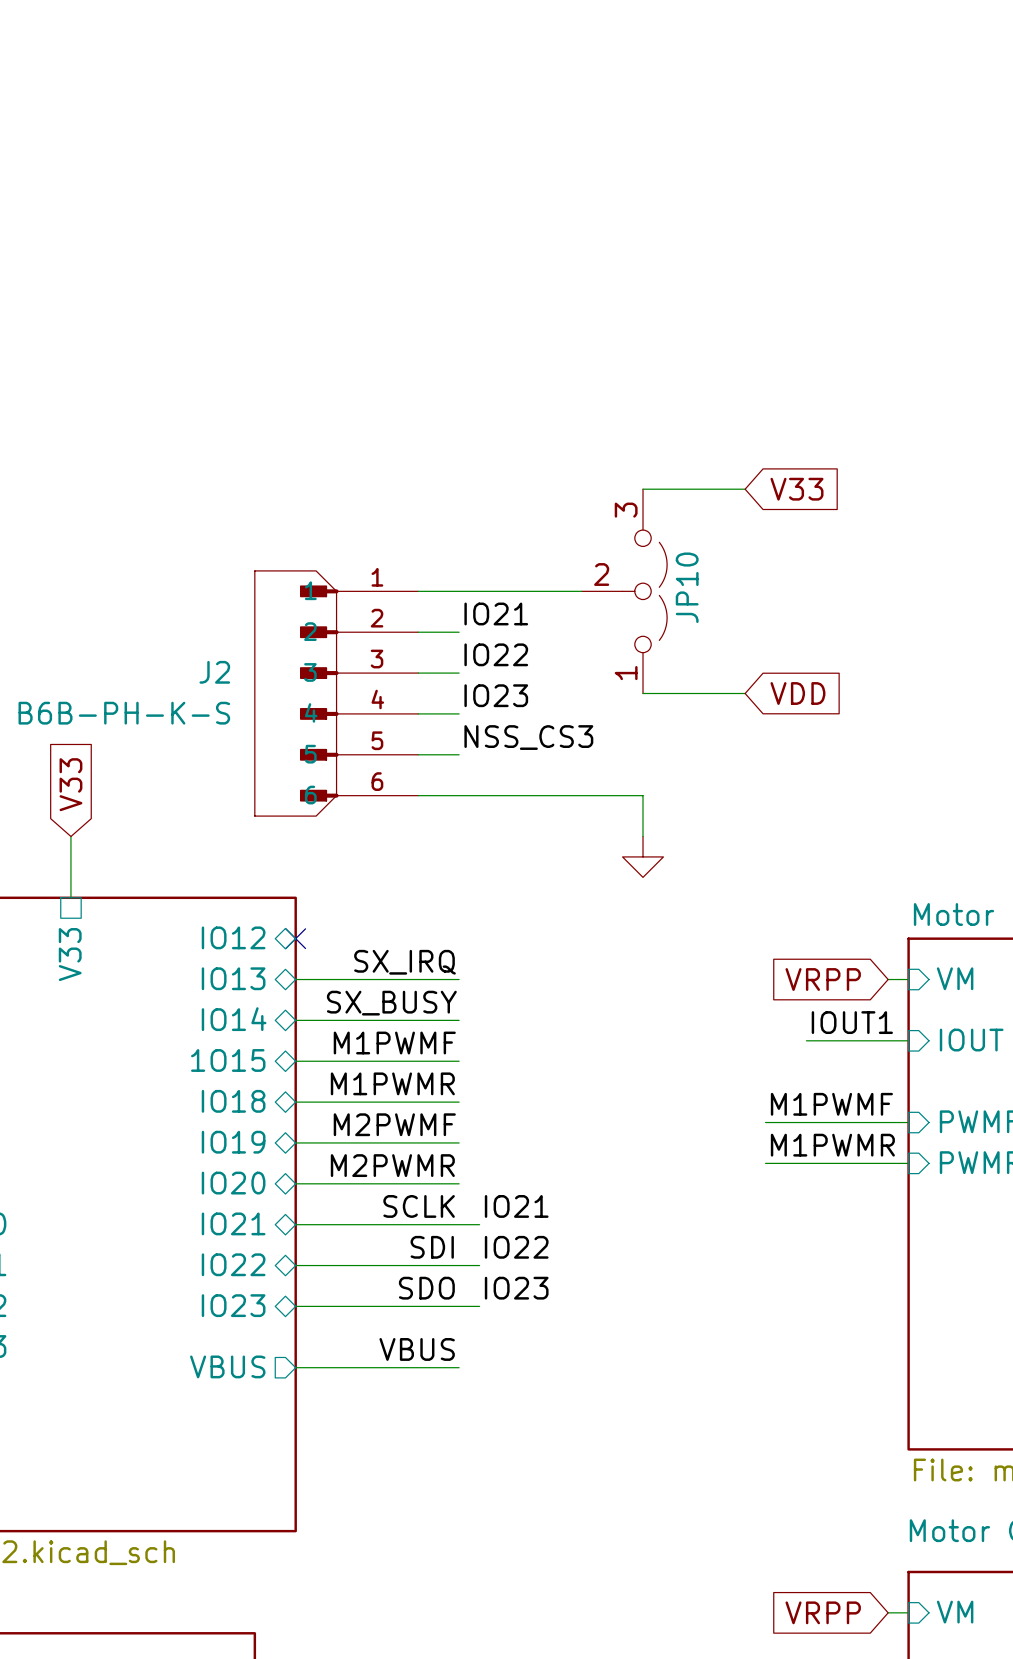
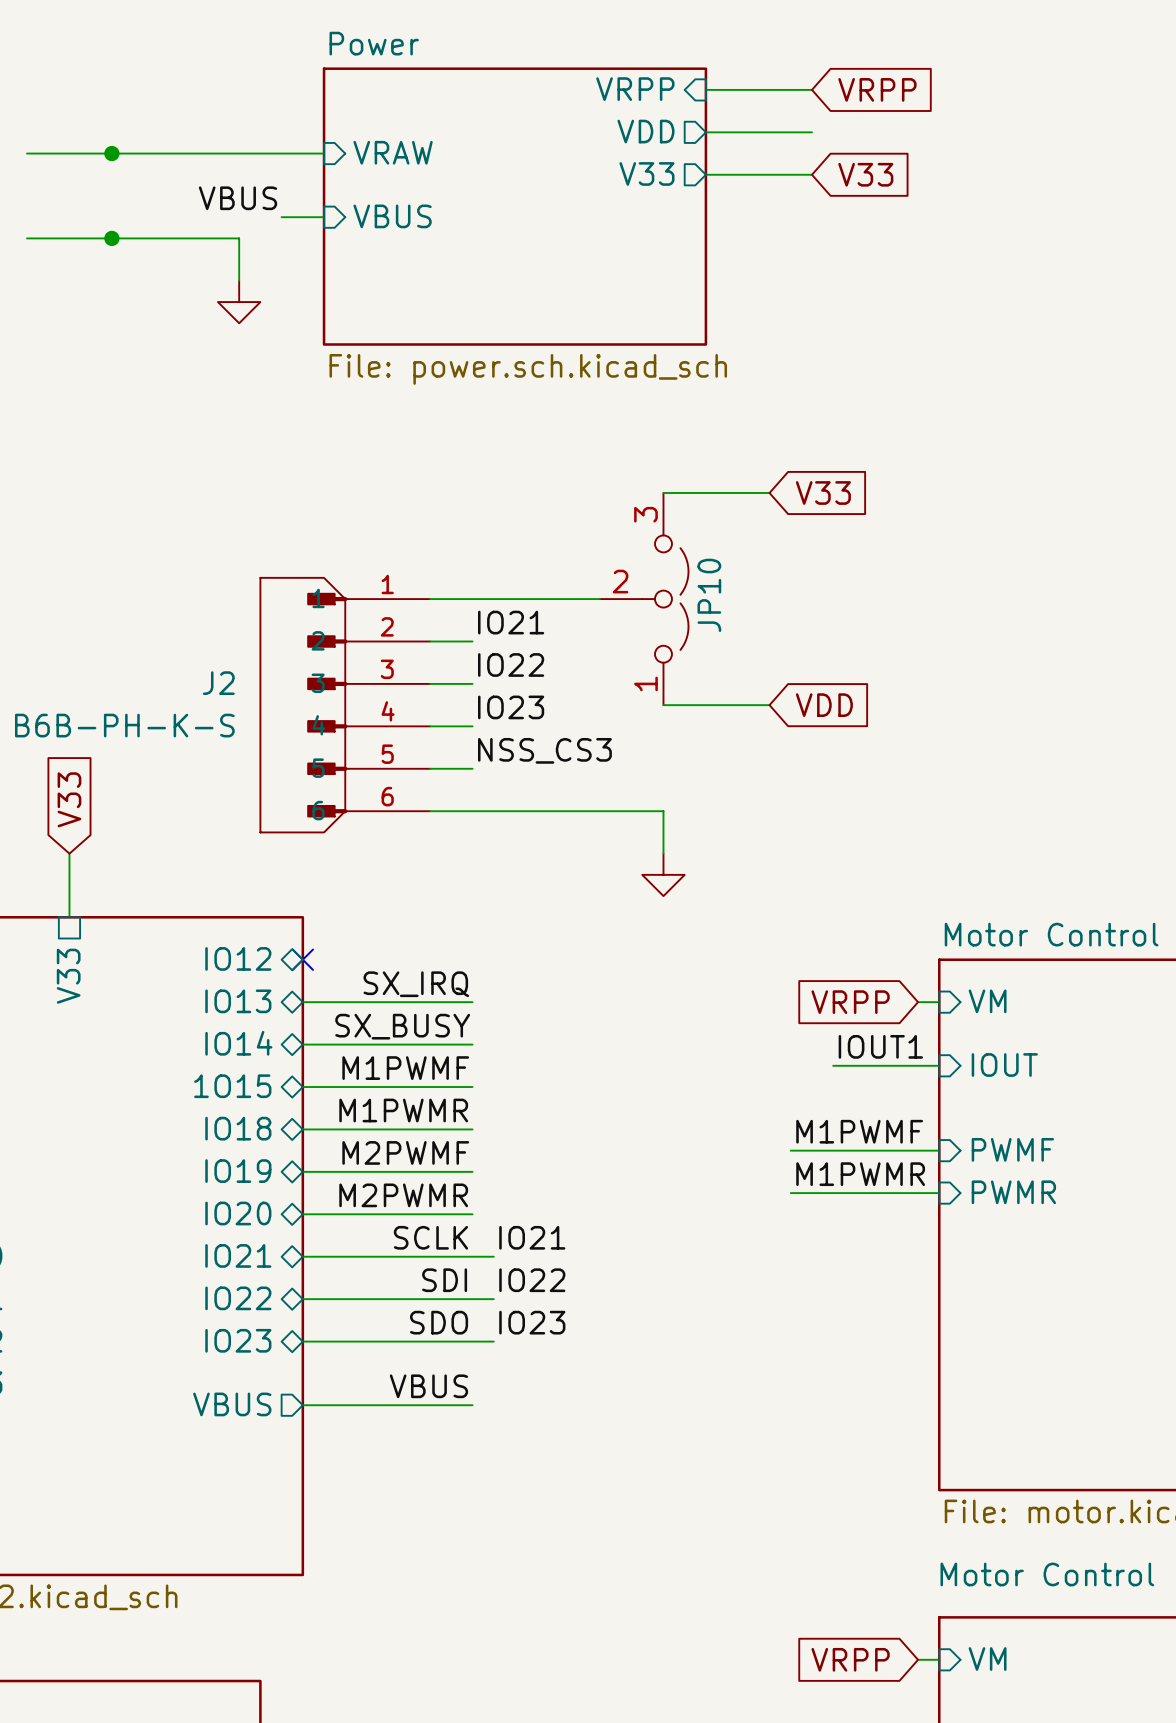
sheet pin: none -> VRPP (635, 89)
wire: none -> (705, 89) (811, 89)
global label: none -> VRPP (877, 89)
sheet pin: none -> VDD (645, 131)
wire: none -> (705, 132) (811, 132)
sheet pin: none -> VRAW (393, 152)
wire: none -> (27, 153) (324, 153)
junction: none -> (111, 153)
sheet pin: none -> V33 (646, 173)
wire: none -> (705, 174) (811, 174)
global label: none -> V33 (865, 174)
label: none -> VBUS (238, 198)
sheet Power: none -> File: power.sch.kicad_sch (514, 206)
sheet pin: none -> VBUS (392, 216)
wire: none -> (281, 217) (324, 217)
wire: none -> (27, 238) (239, 238) (239, 280)
junction: none -> (111, 238)
power symbol: none -> (239, 302)

